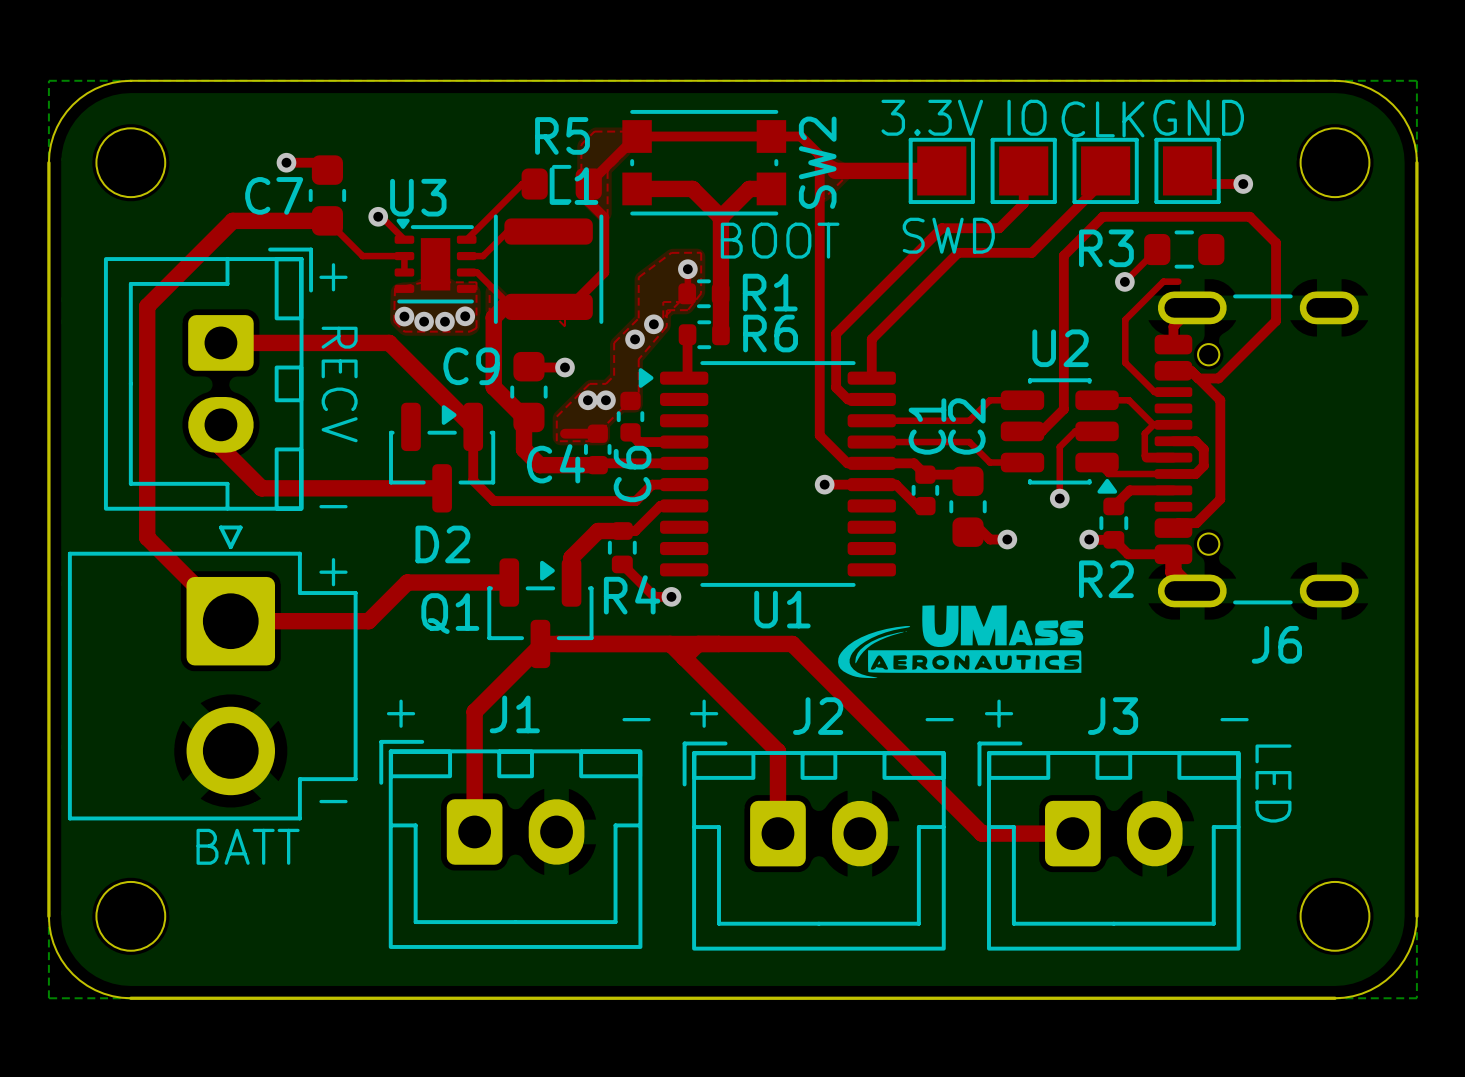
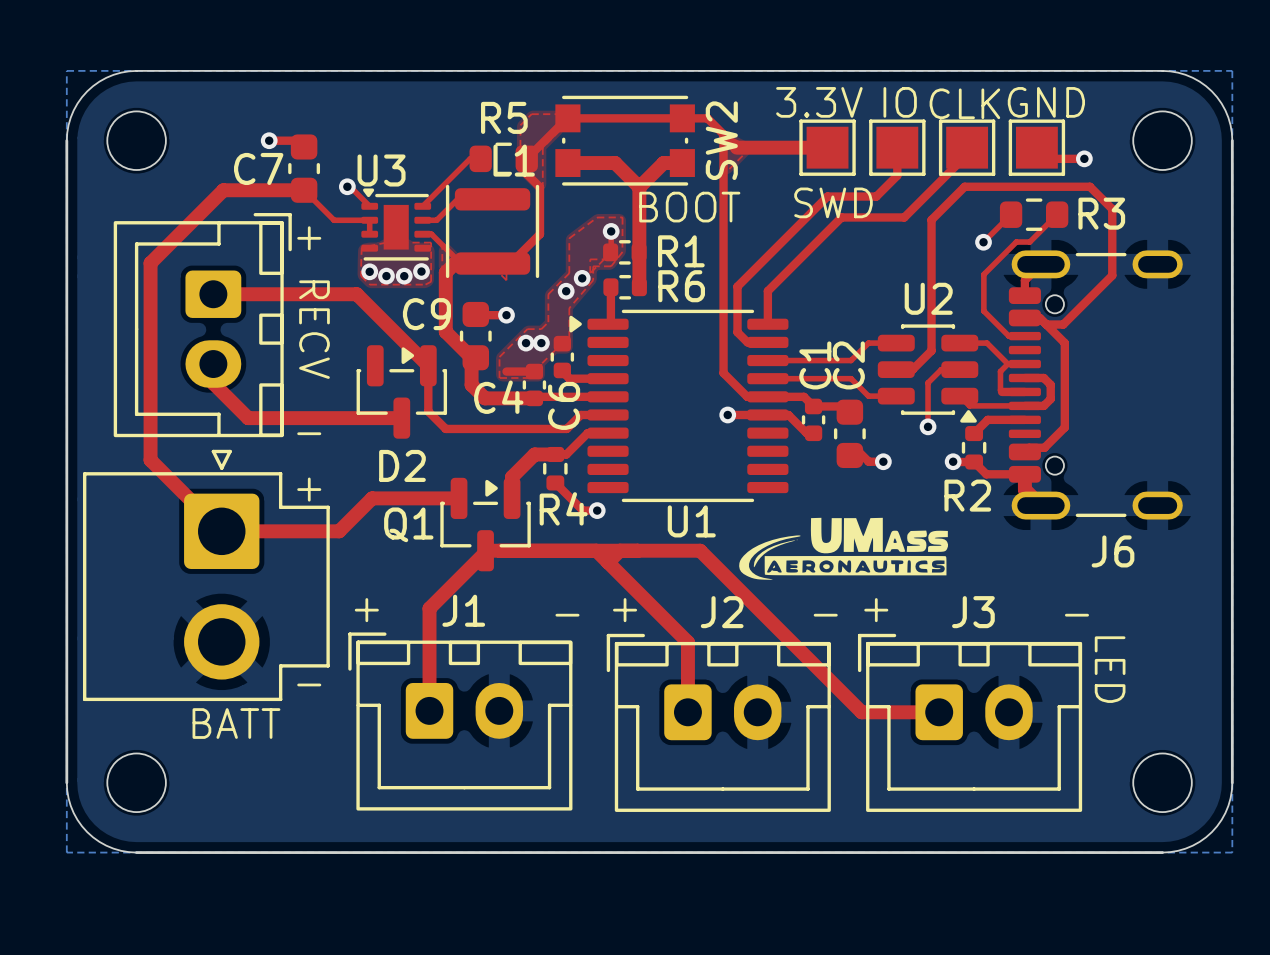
R3 name position: R3 (1106, 248) -> R3 (1101, 213)
top track: none -> (1057, 214) (1029, 242)

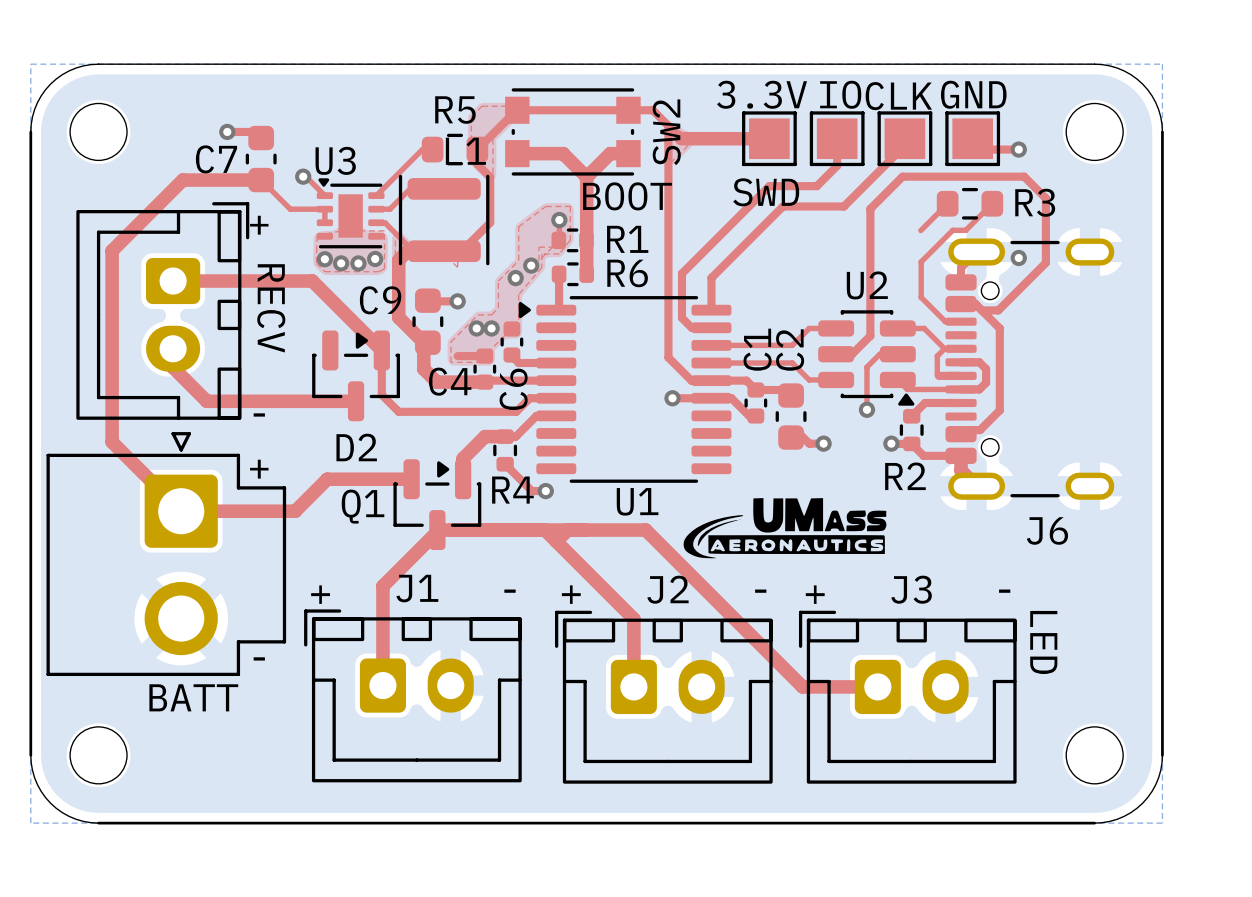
via position: (983, 242) -> (1018, 257)

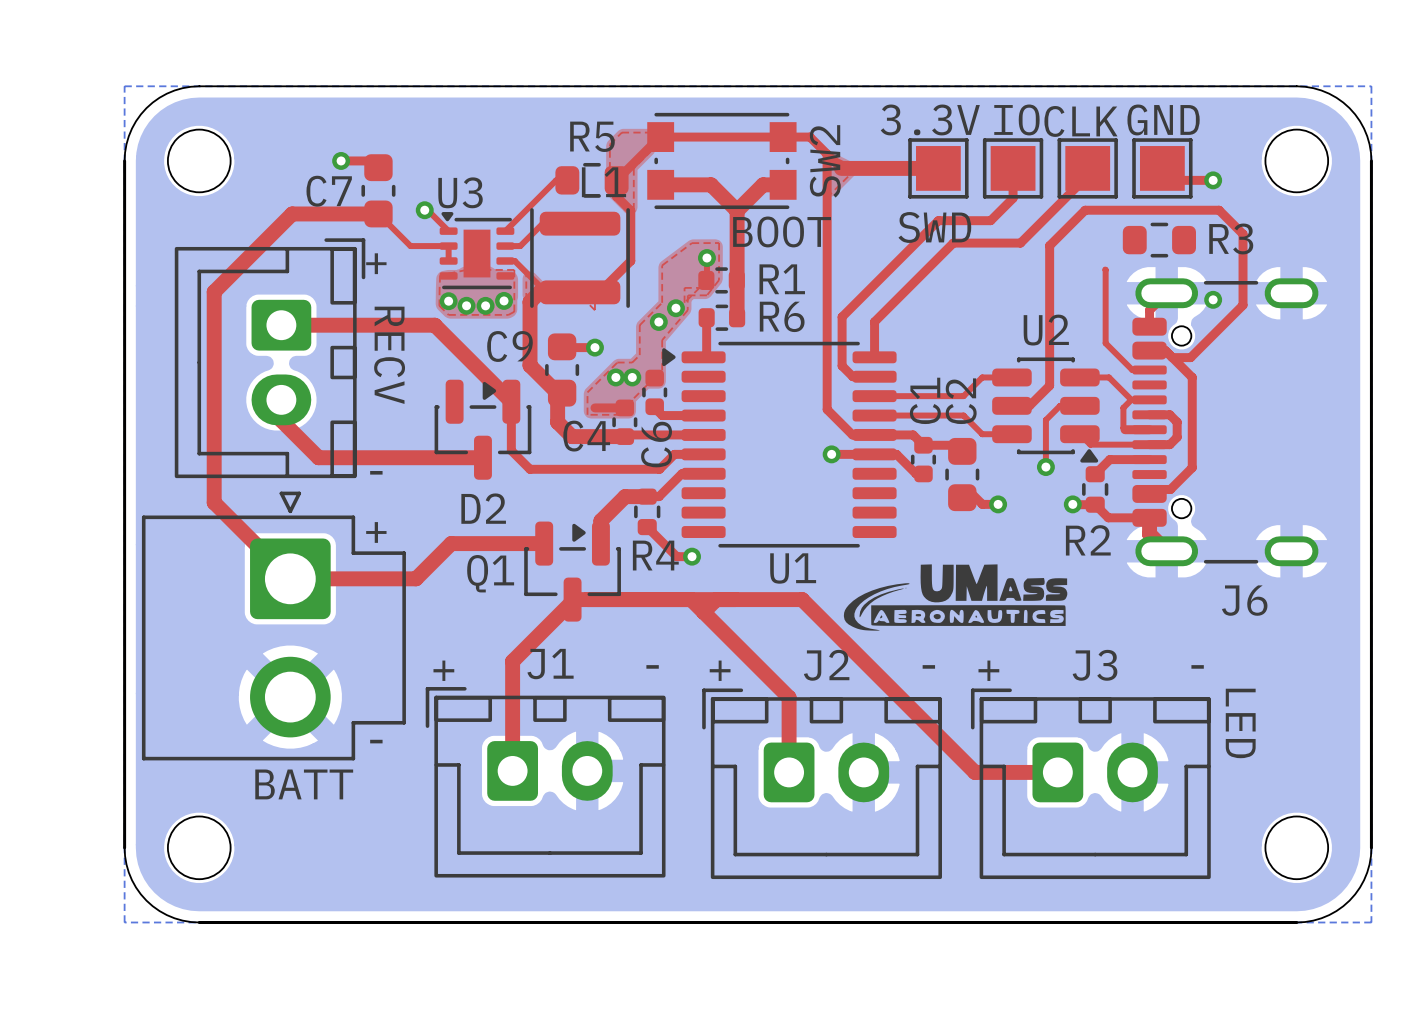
top track: (947, 203) (920, 230) -> (1105, 304) (1105, 269)
top track: (992, 203) (965, 230) (952, 230) (921, 261) -> none

